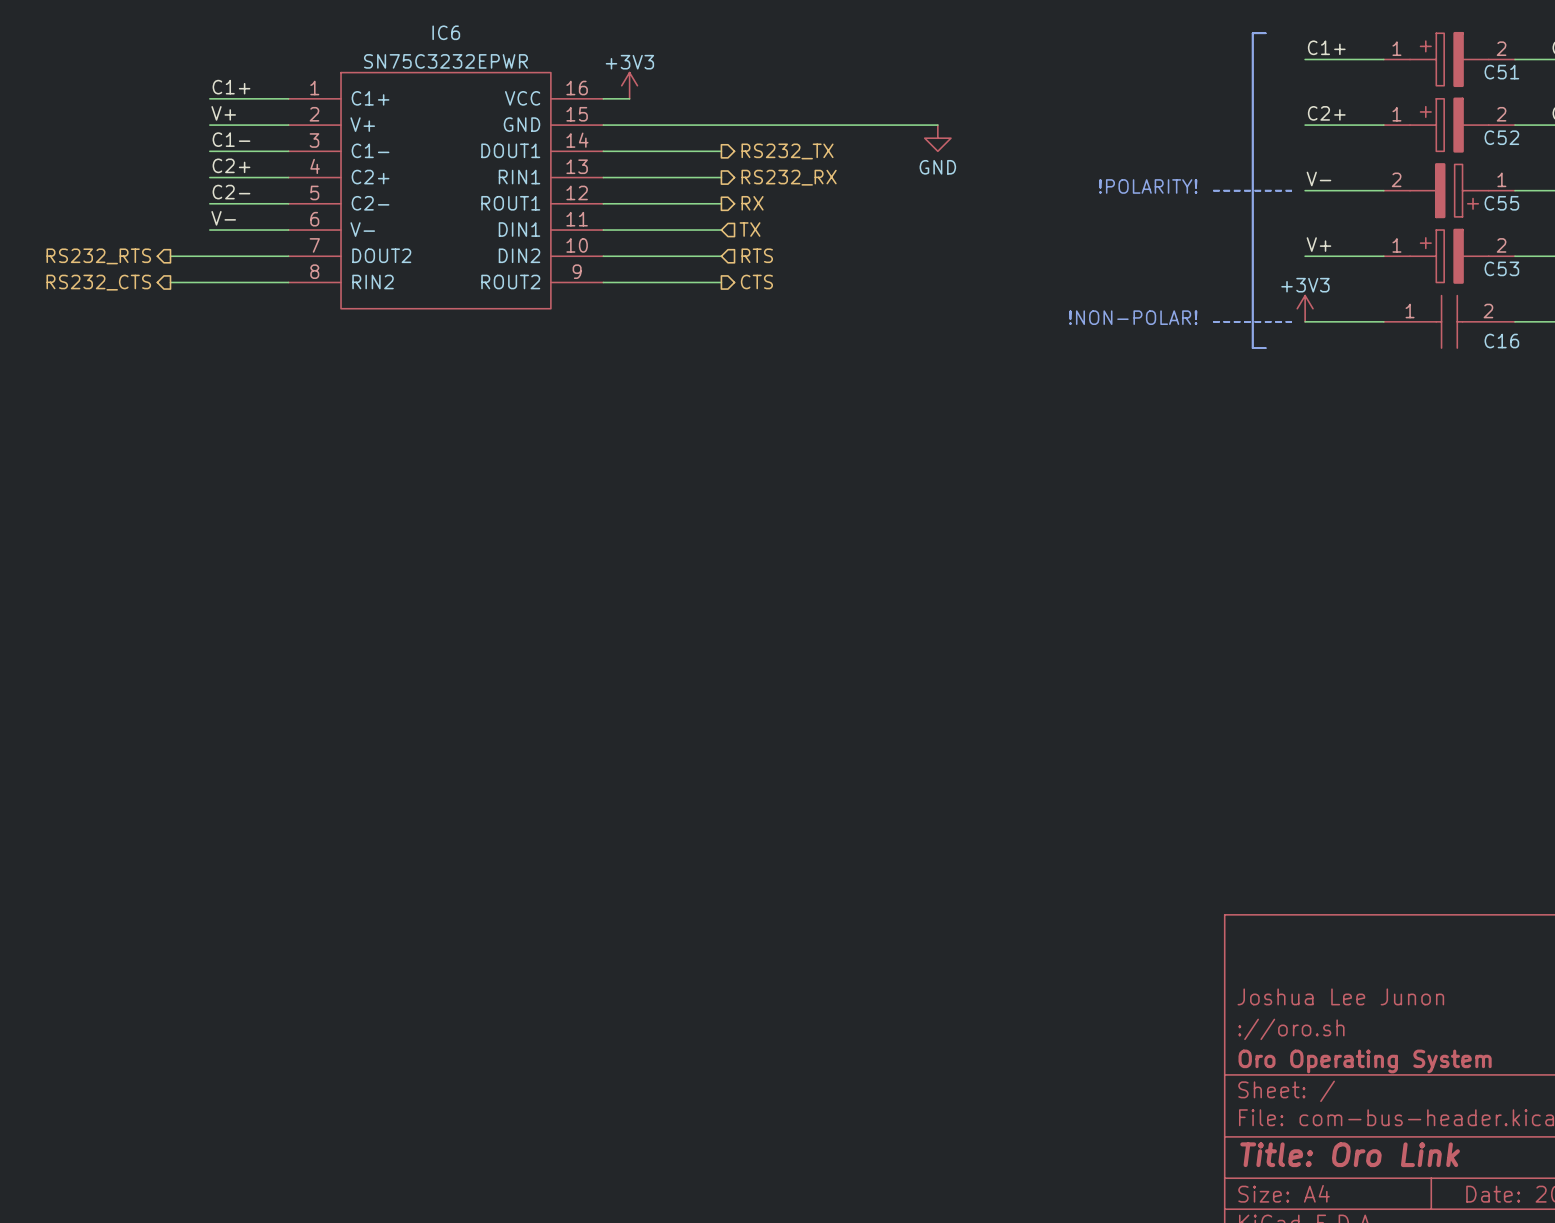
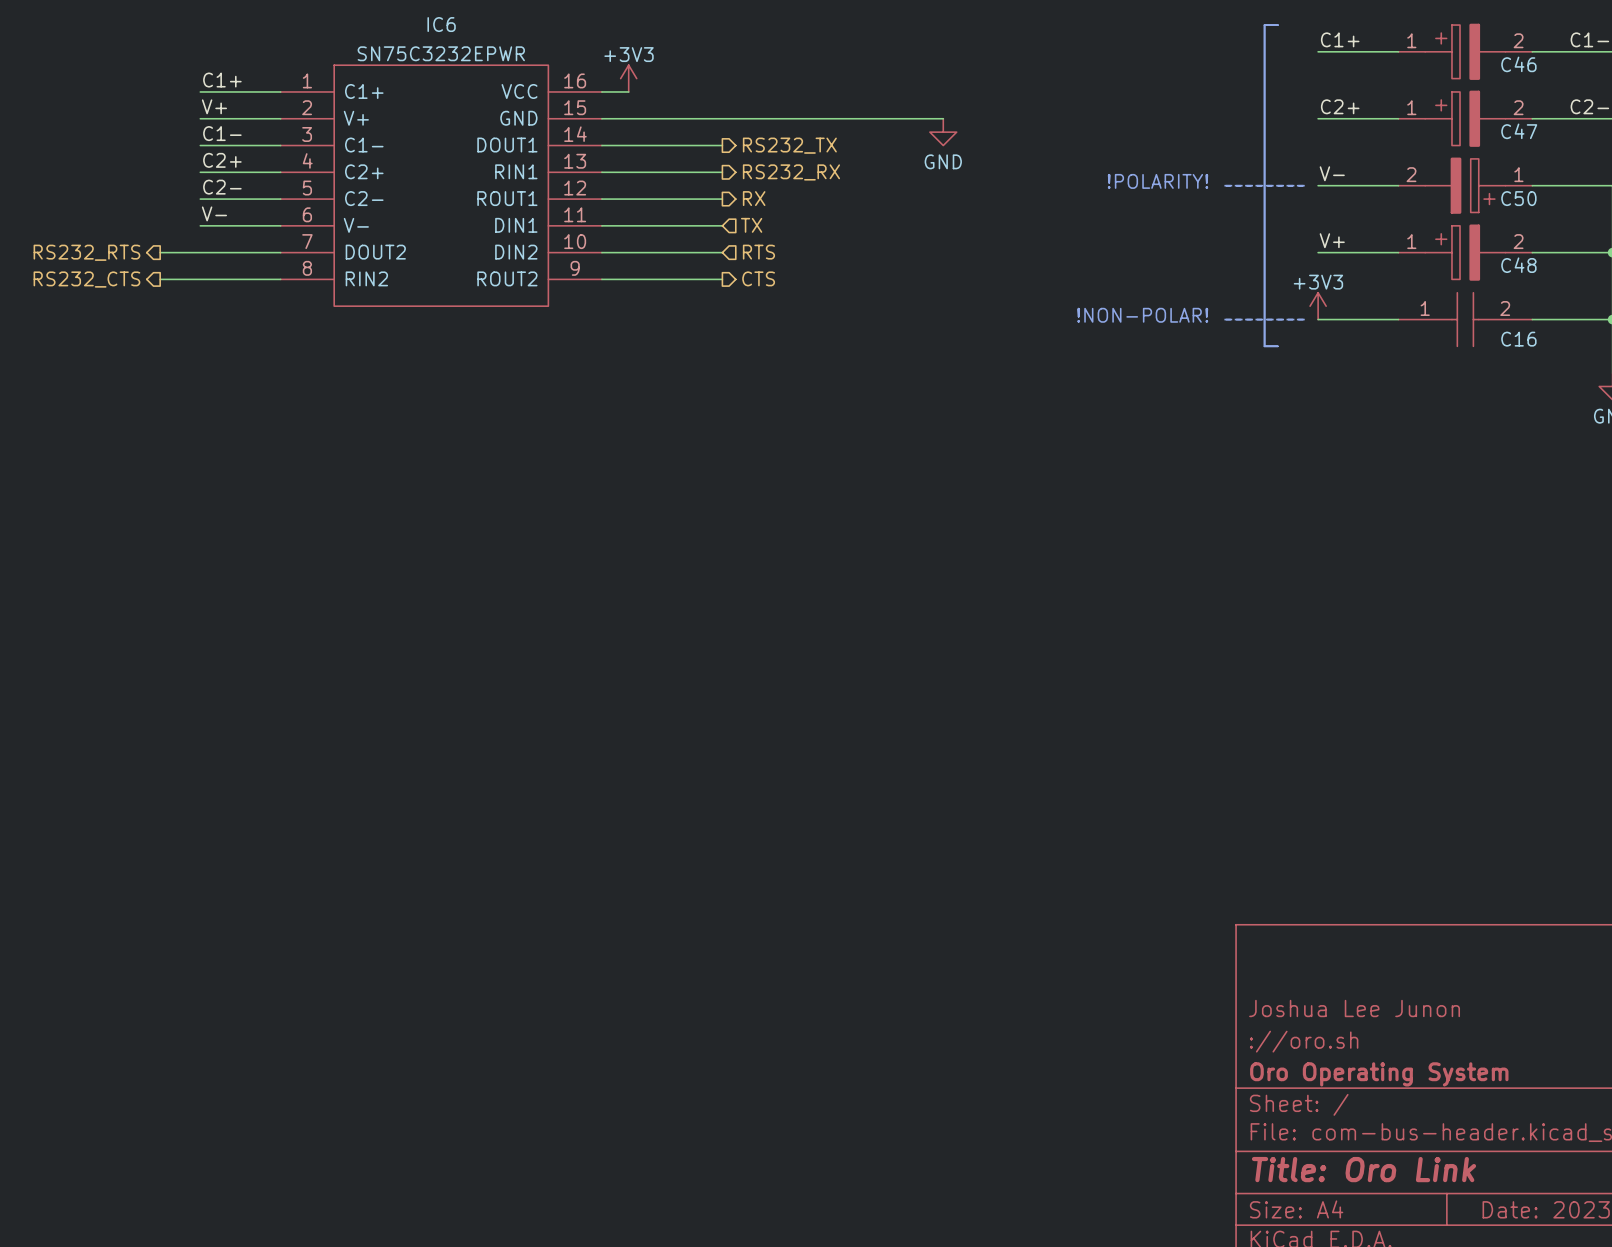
C51 name: C51 (1501, 72) -> C46 (1518, 64)
C52 name: C52 (1501, 137) -> C47 (1519, 131)
C55 name: C55 (1501, 203) -> C50 (1518, 198)
C53 name: C53 (1501, 268) -> C48 (1518, 265)

